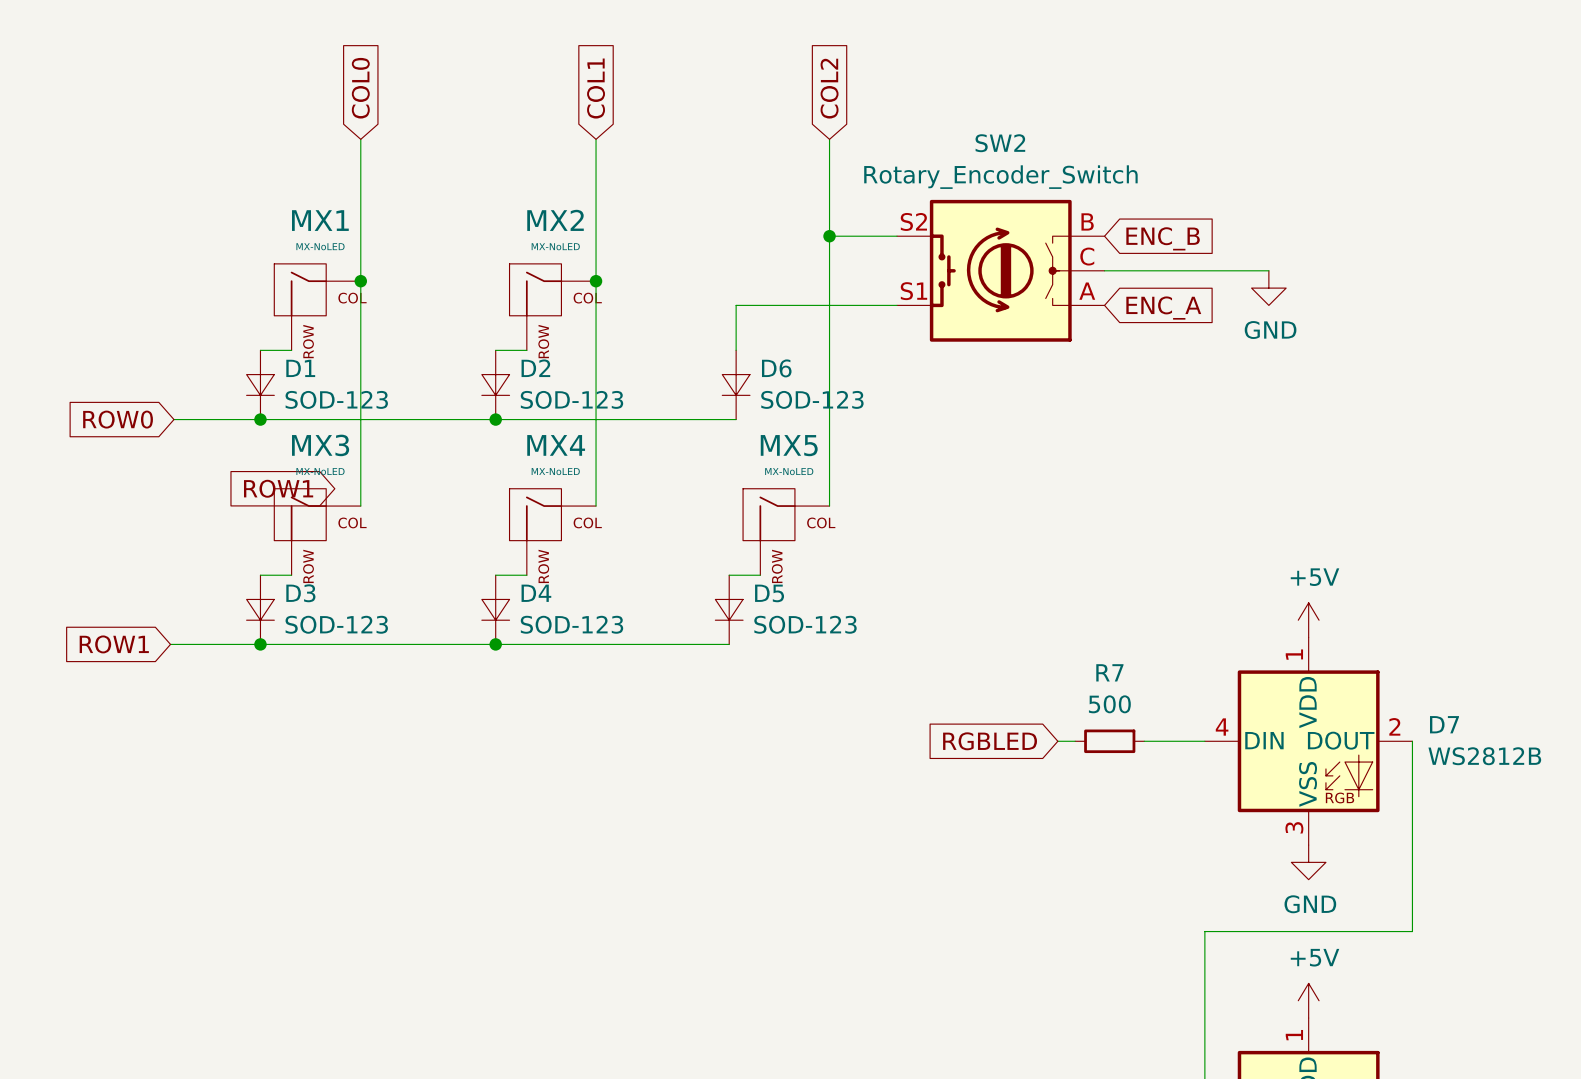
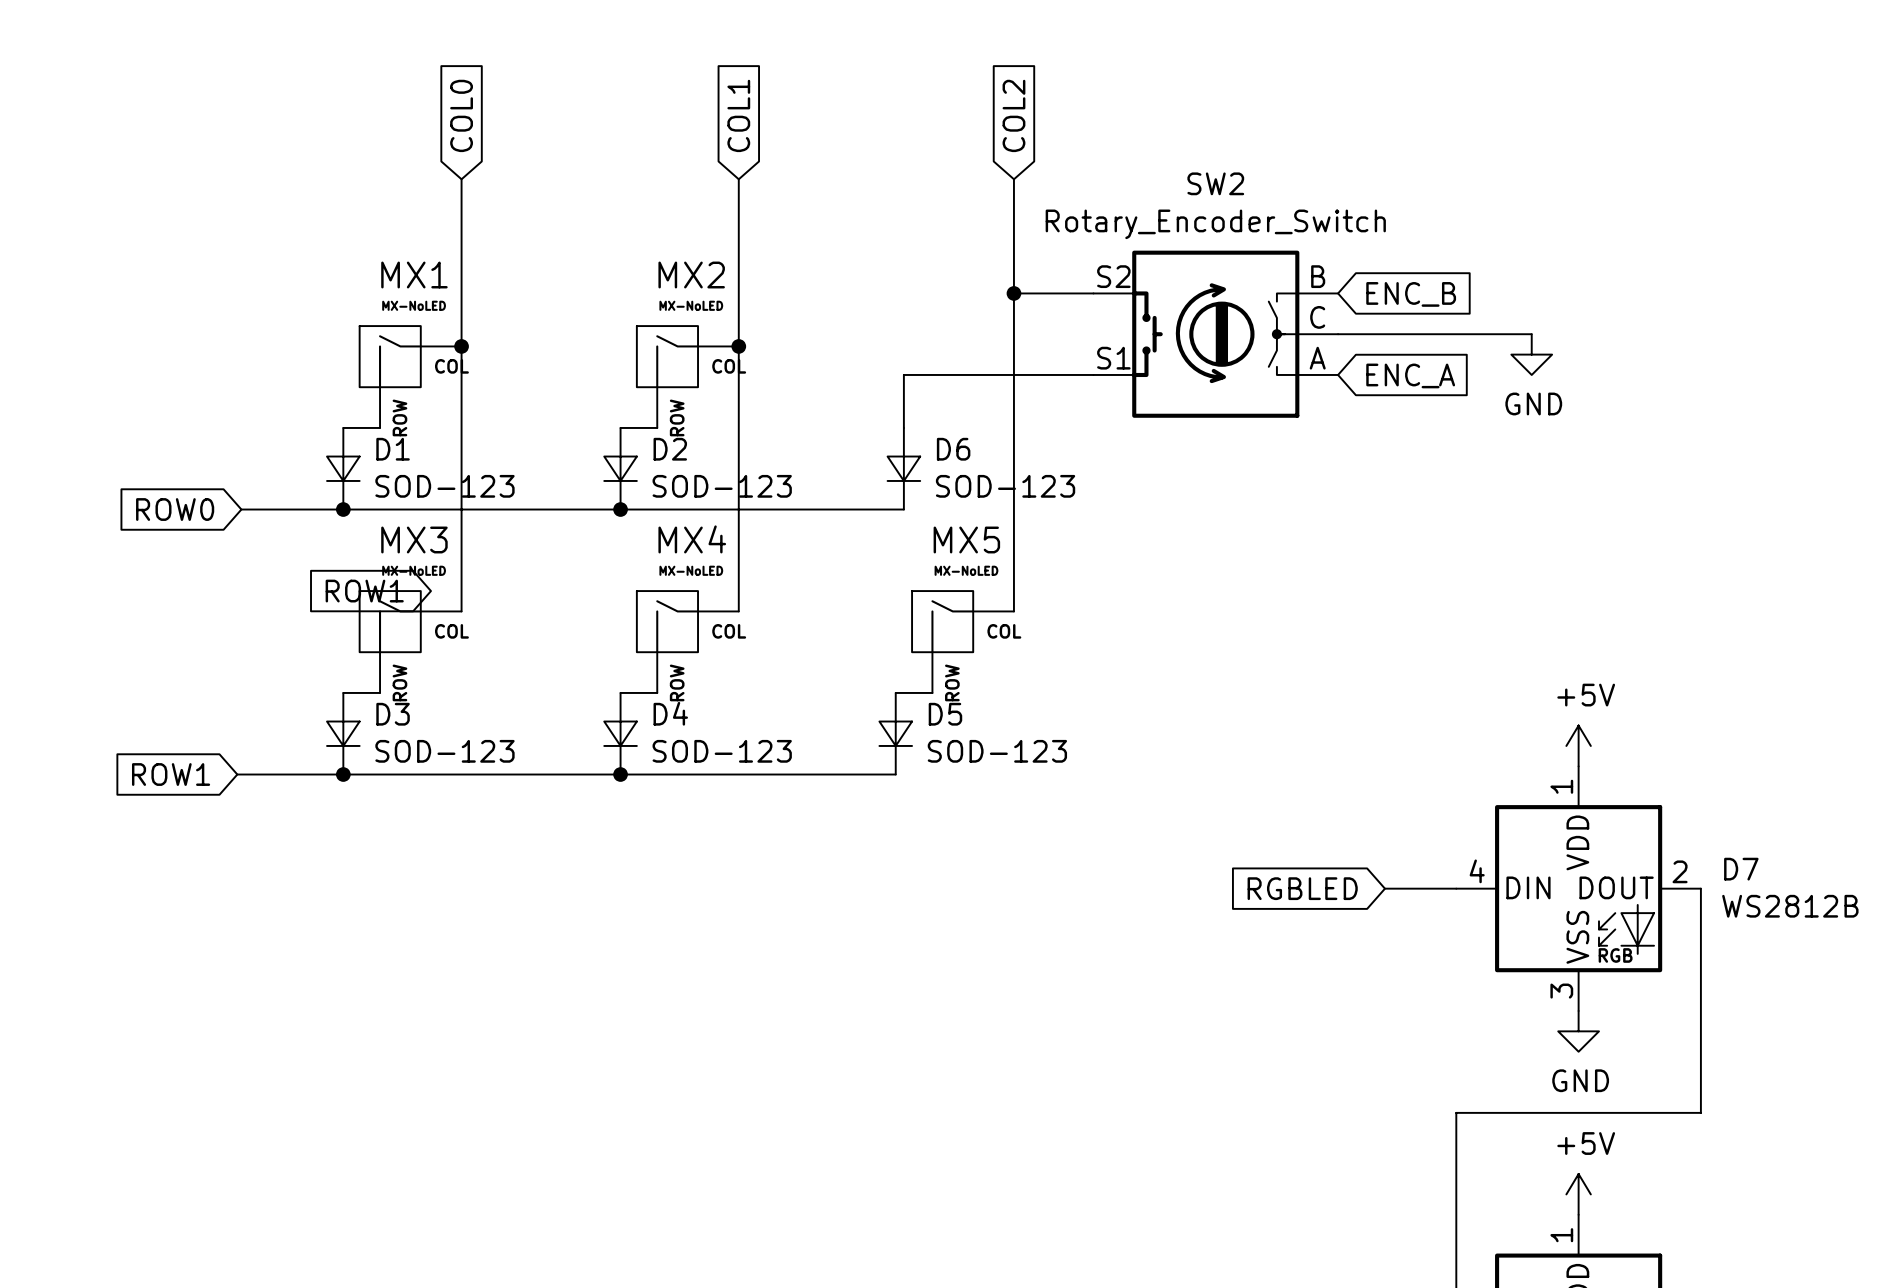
global label position: RGBLED (990, 741) -> RGBLED (1302, 888)
R7: 500 (1109, 741) -> none

